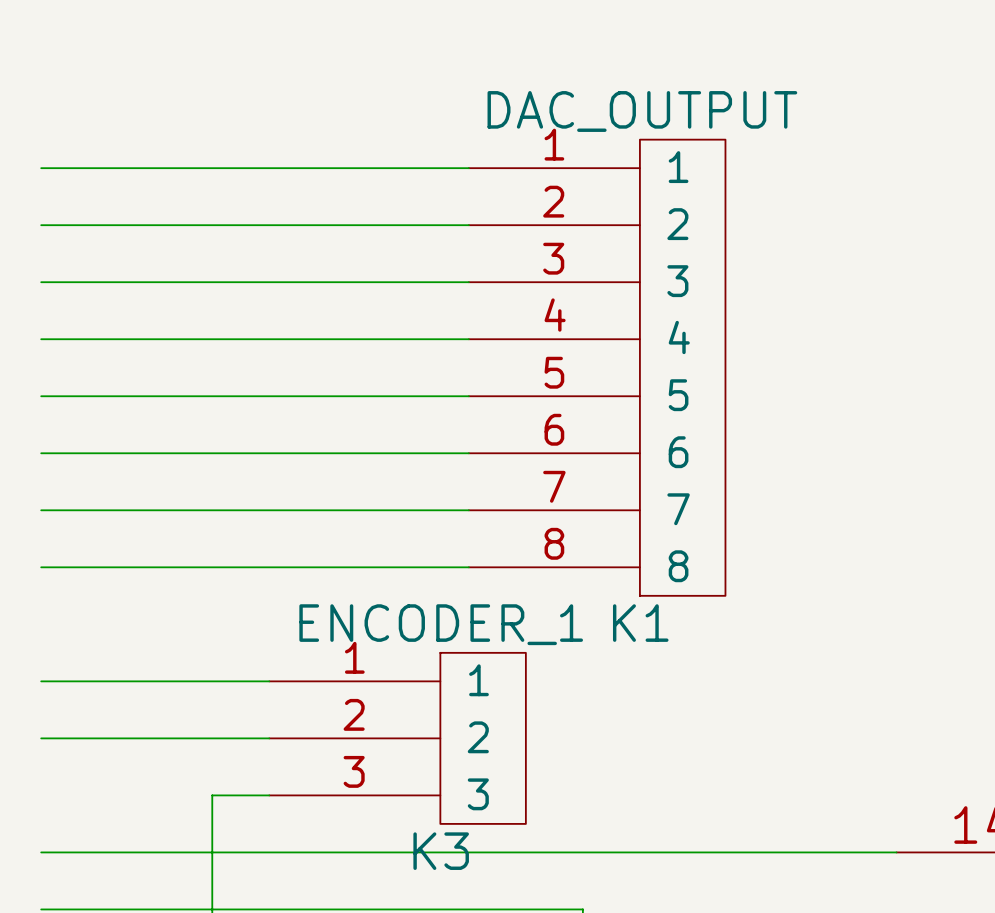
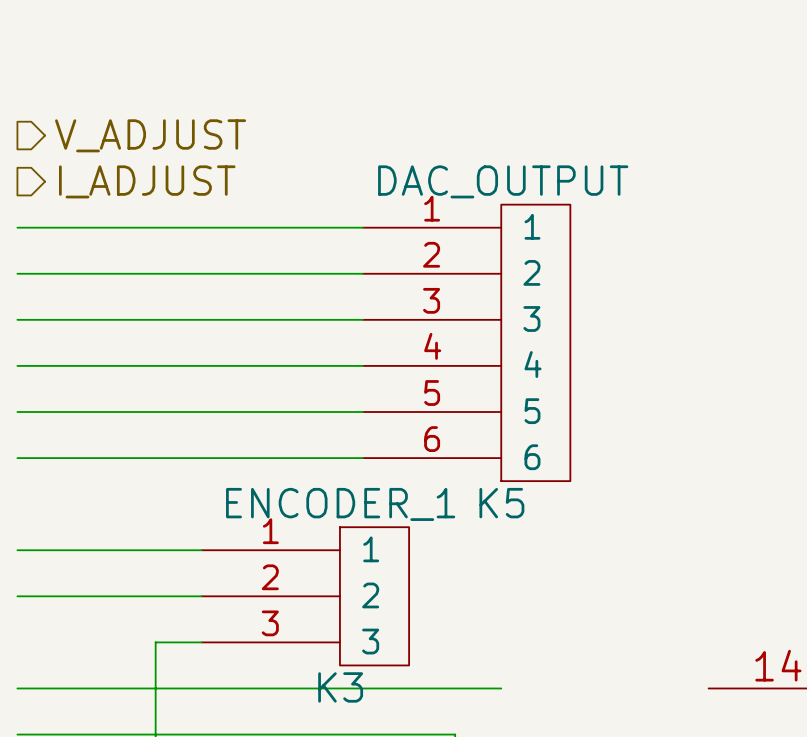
wire: (41, 168) (468, 168) -> none
hierarchical label: none -> V_ADJUST (150, 135)
wire: (41, 225) (468, 225) -> none
hierarchical label: none -> I_ADJUST (147, 181)
K1: DAC_OUTPUT (597, 367) -> none
K5: none -> DAC_OUTPUT (466, 342)
wire: (639, 852) (896, 852) -> none

